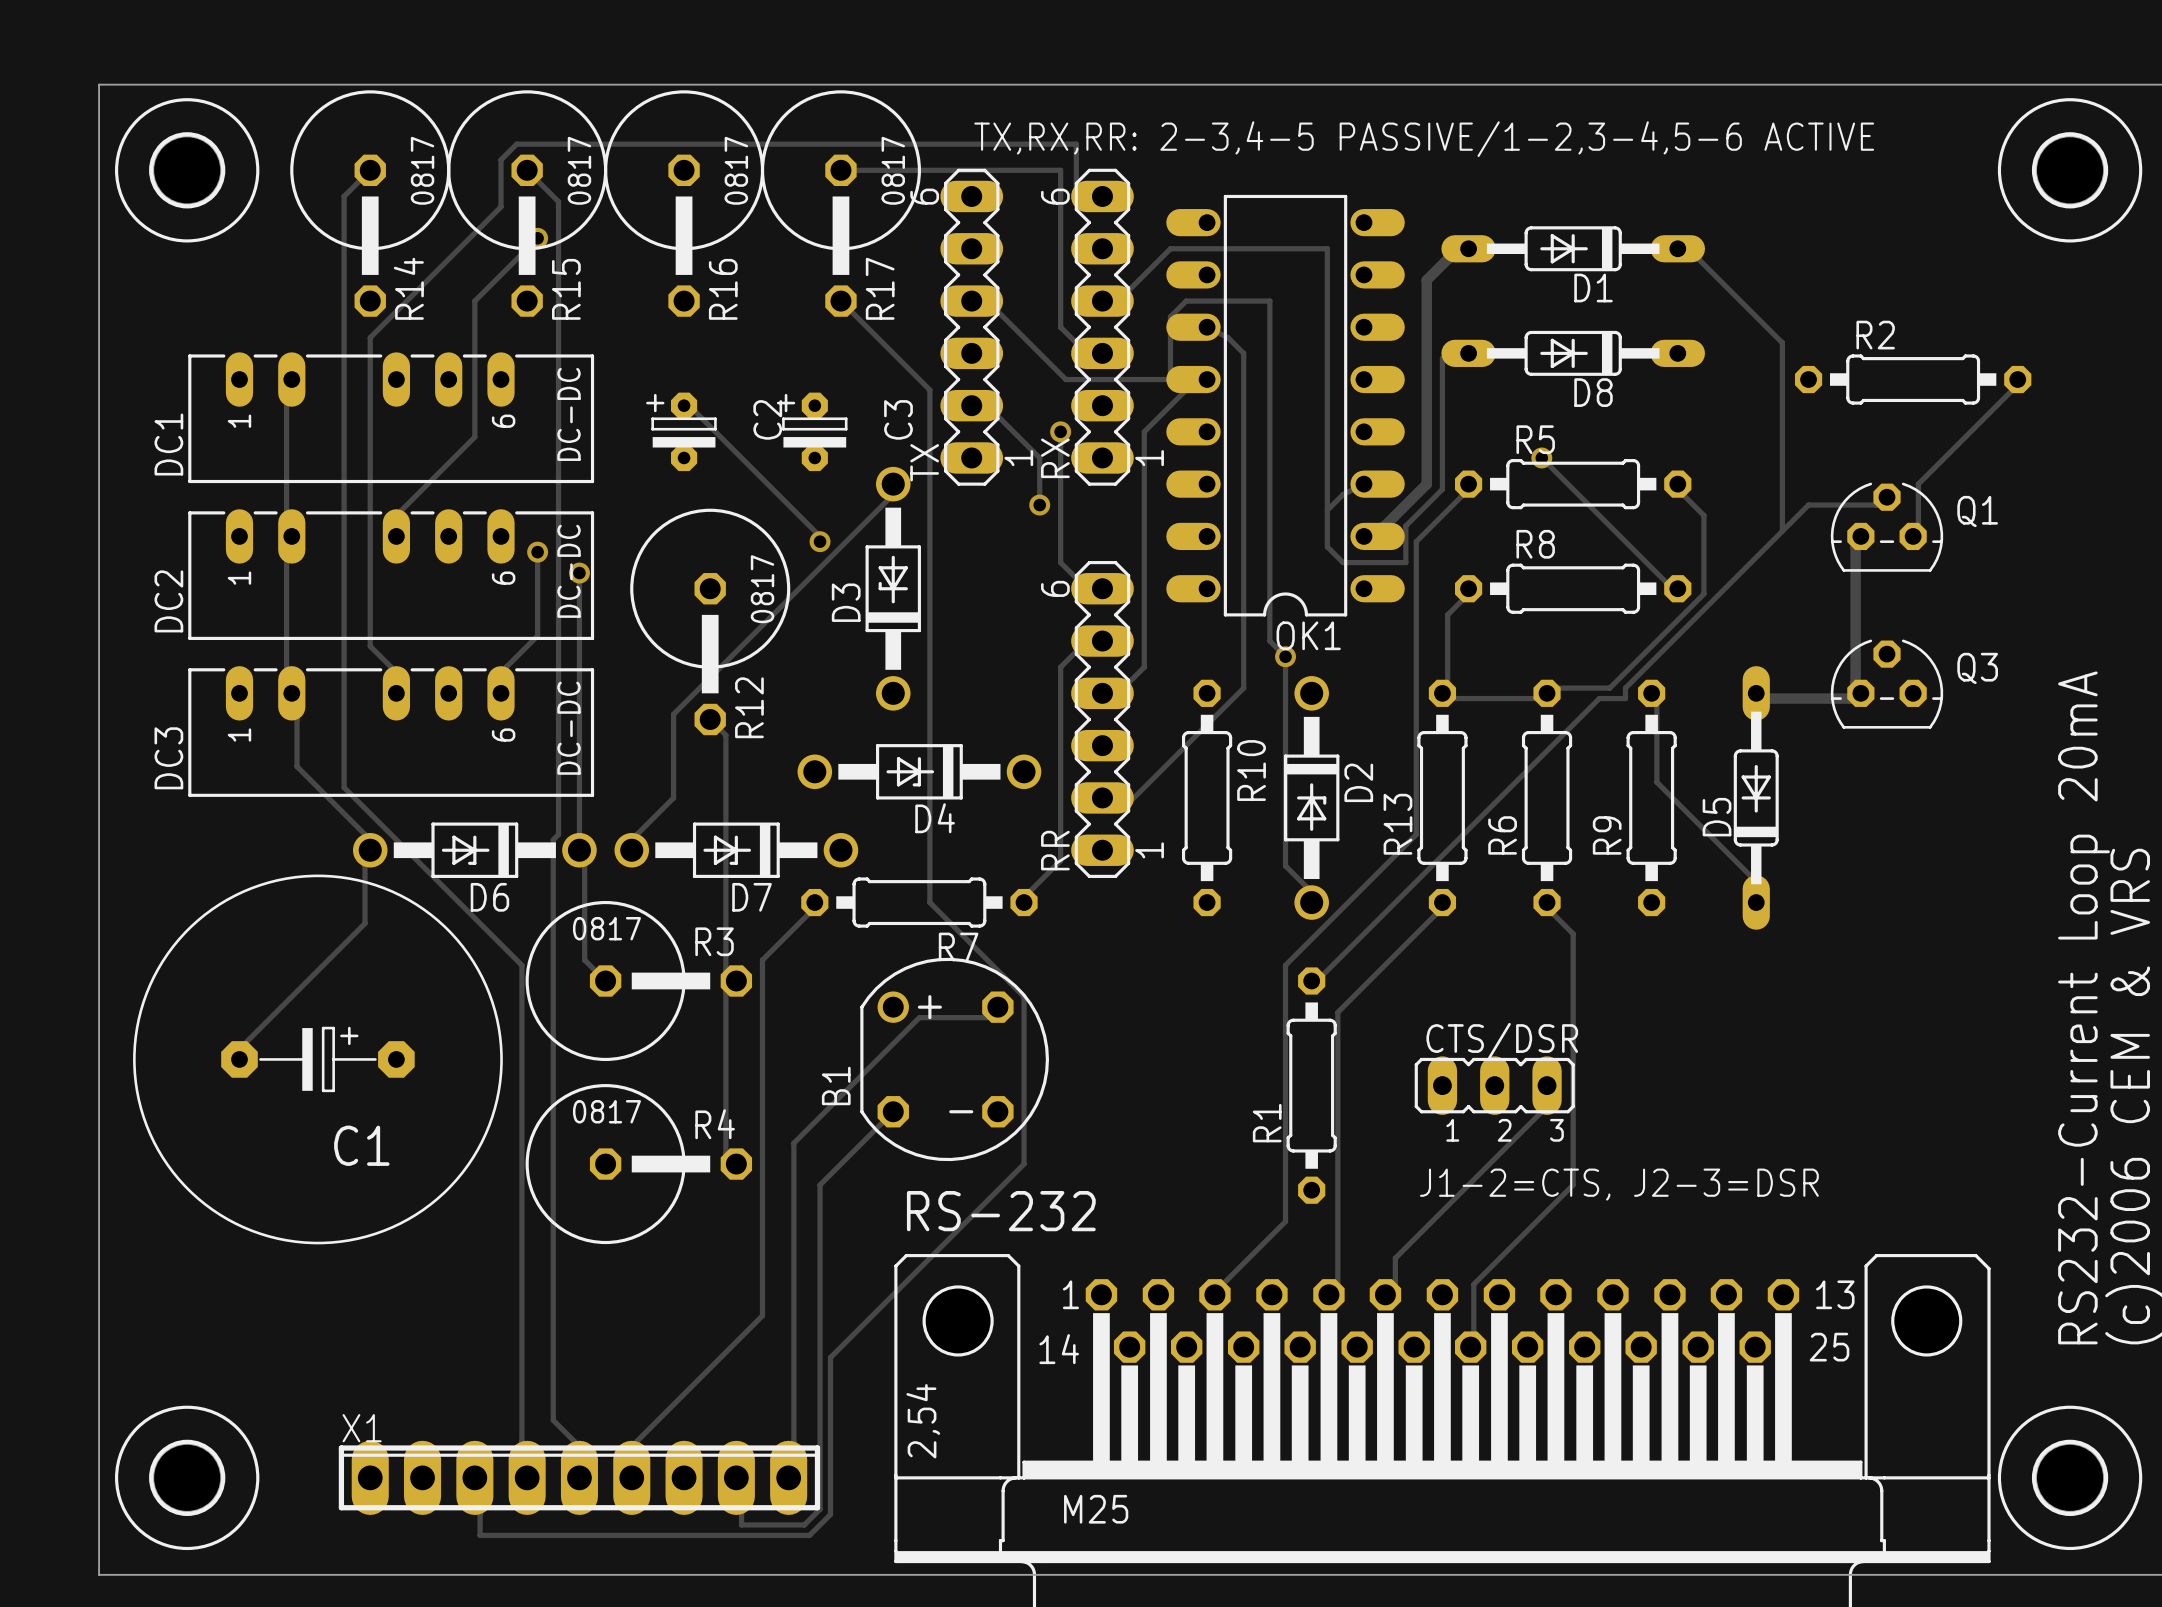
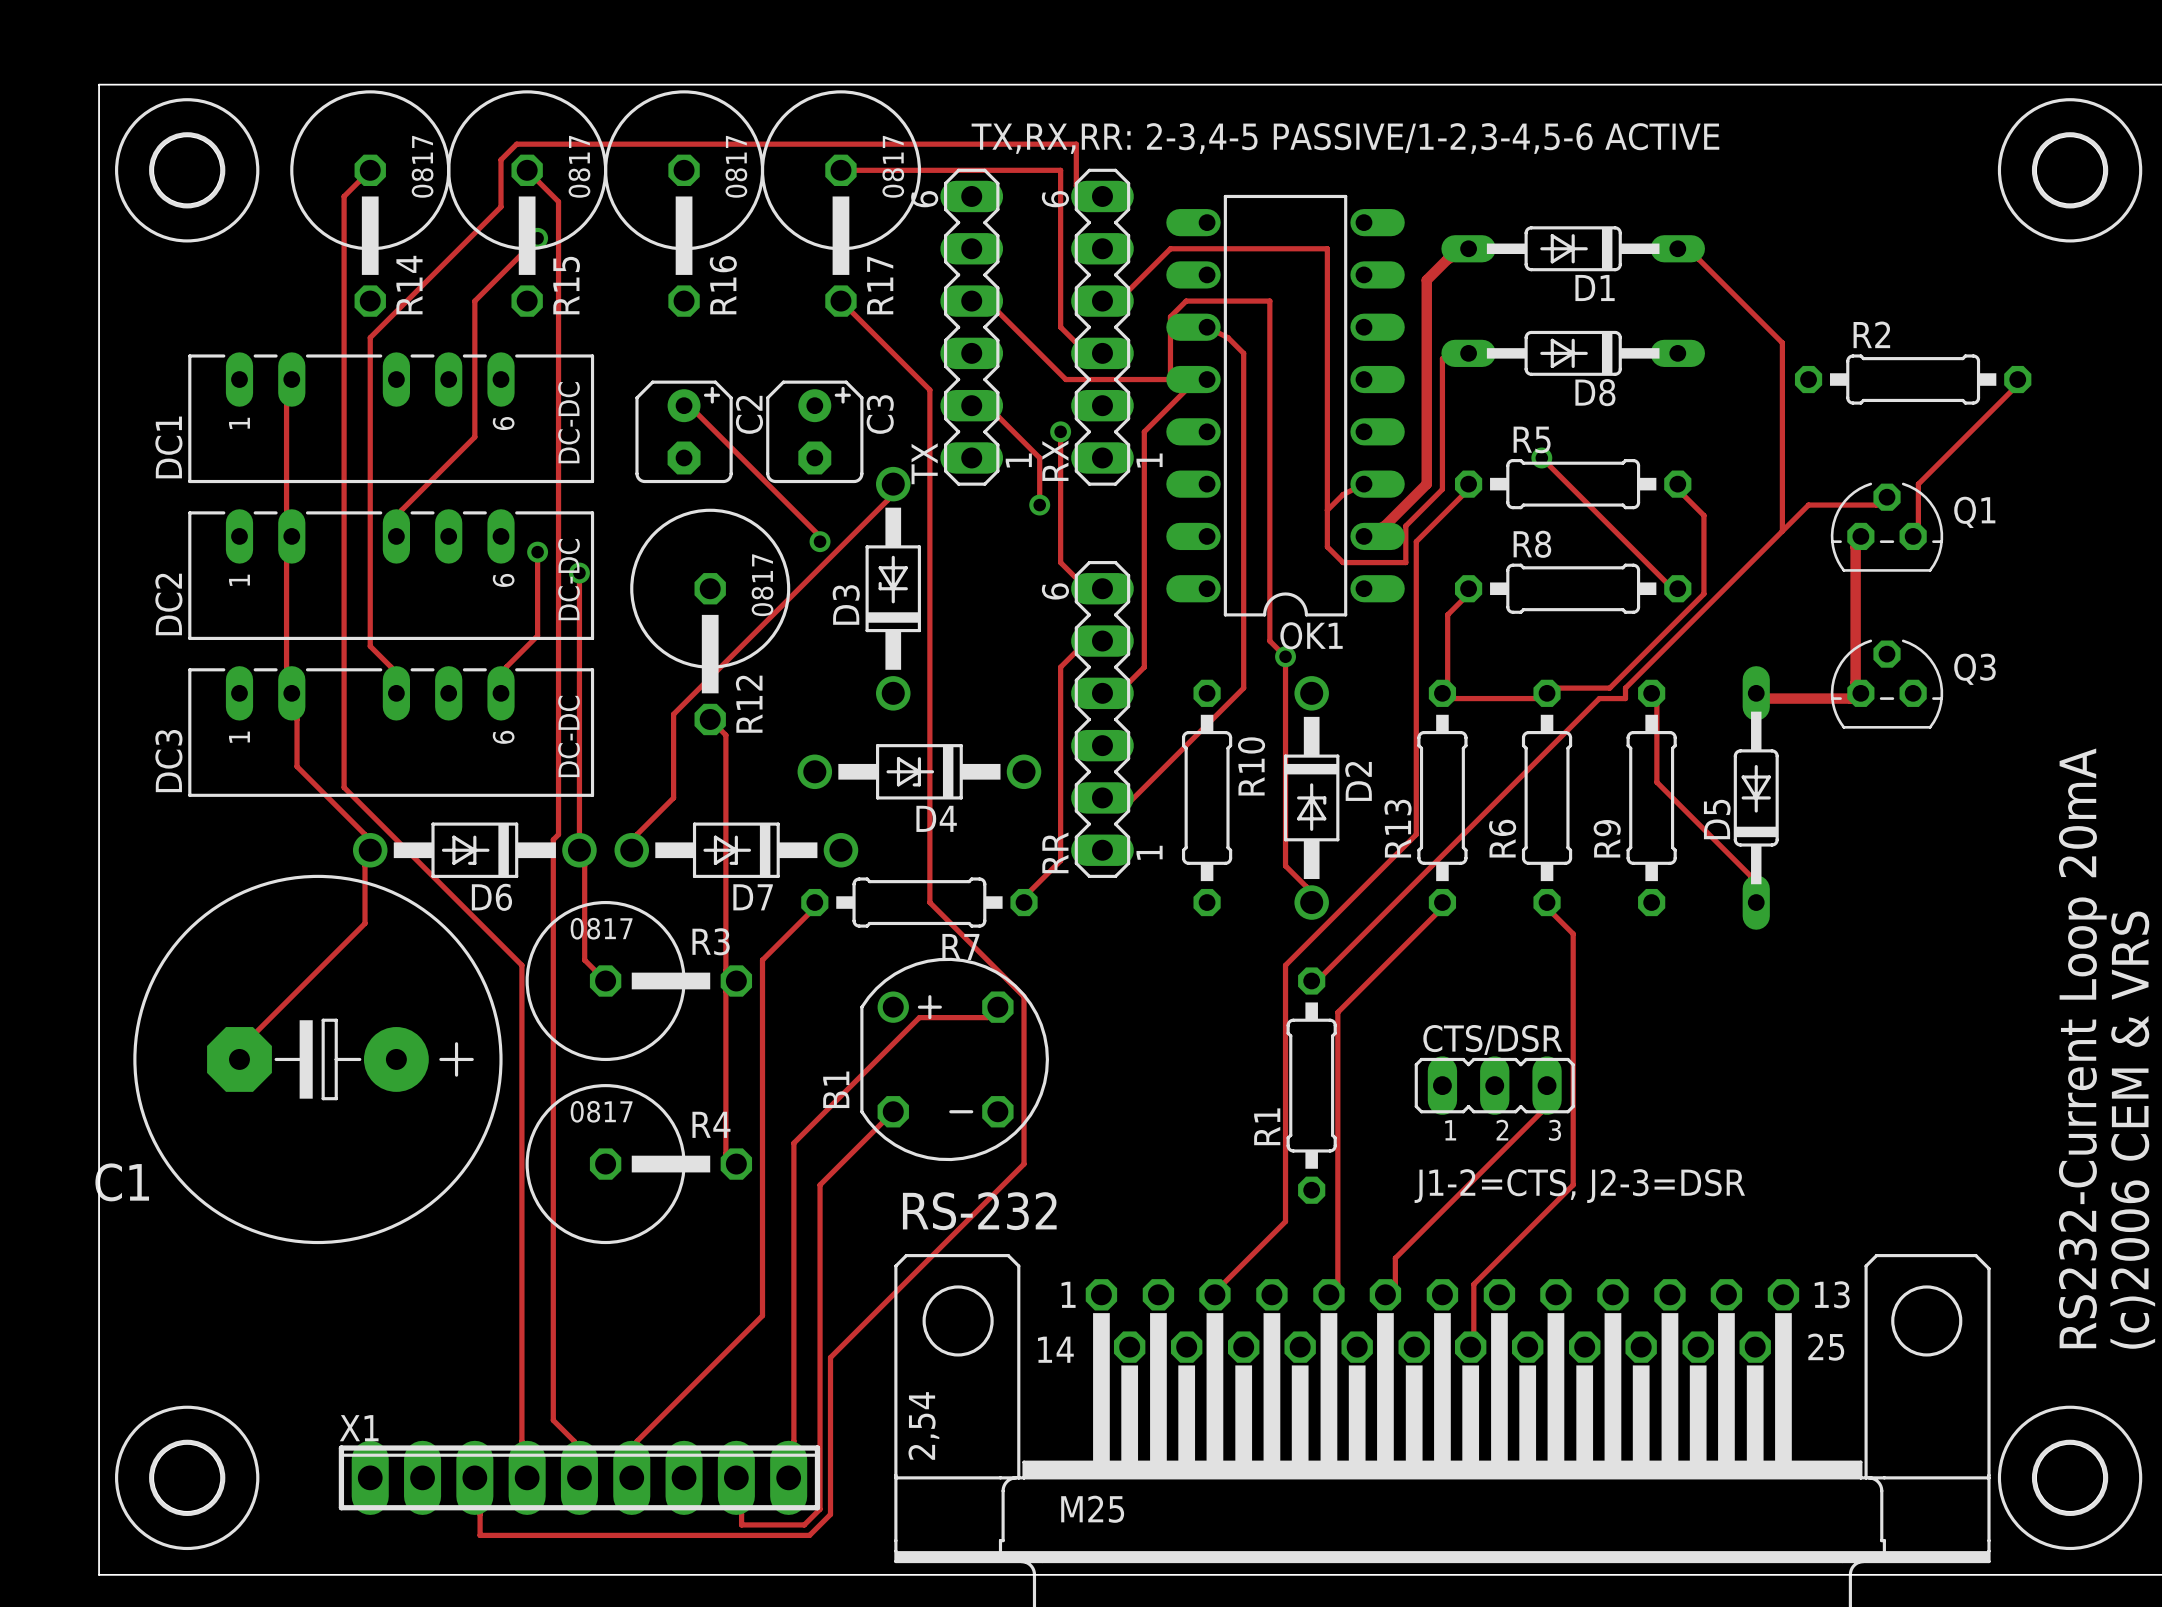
C2 footprint: [646, 392, 717, 472] -> [635, 380, 733, 484]
C3 footprint: [776, 392, 848, 472] -> [766, 380, 864, 484]
C1 footprint: [133, 874, 503, 1245] -> [133, 874, 503, 1245]
C1 name position: C1 (361, 1145) -> C1 (122, 1182)

